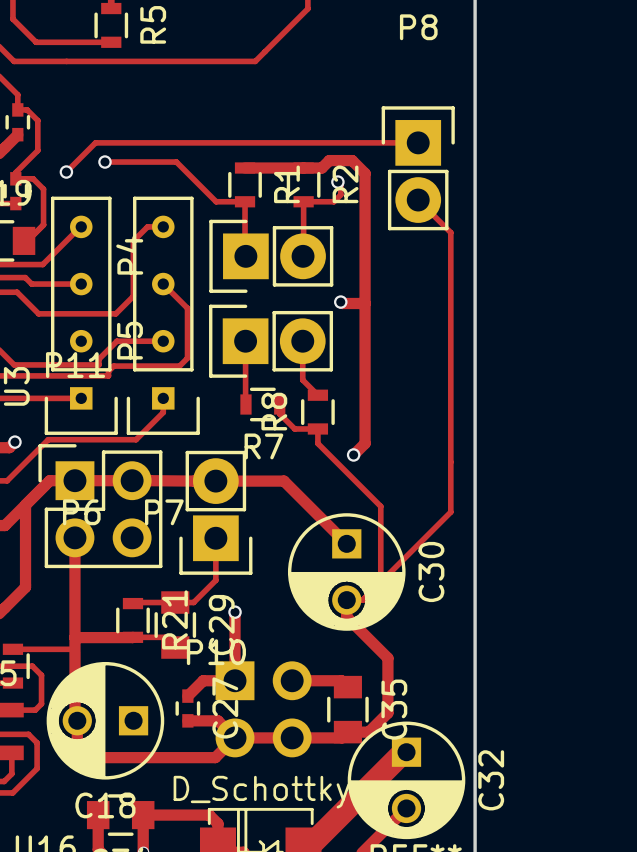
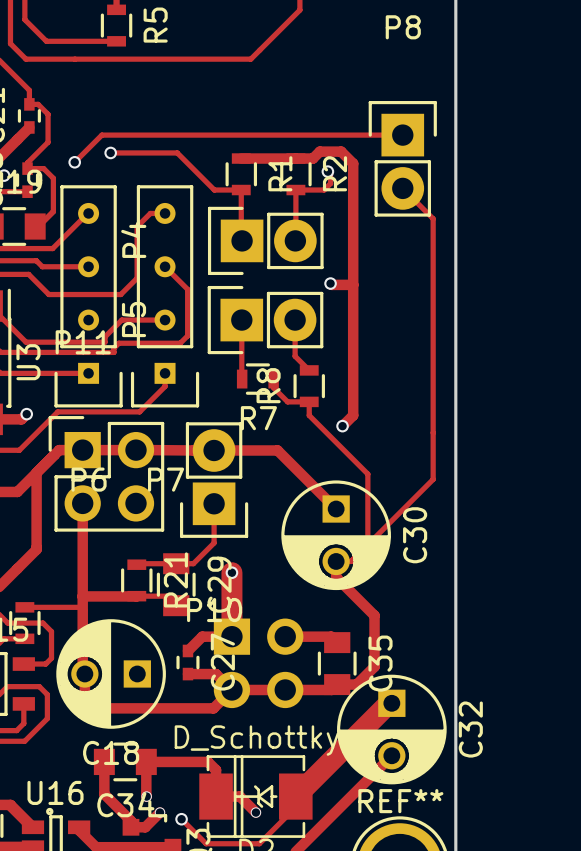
track width: thin (235, 612) (235, 680) -> thick (231, 572) (231, 636)

